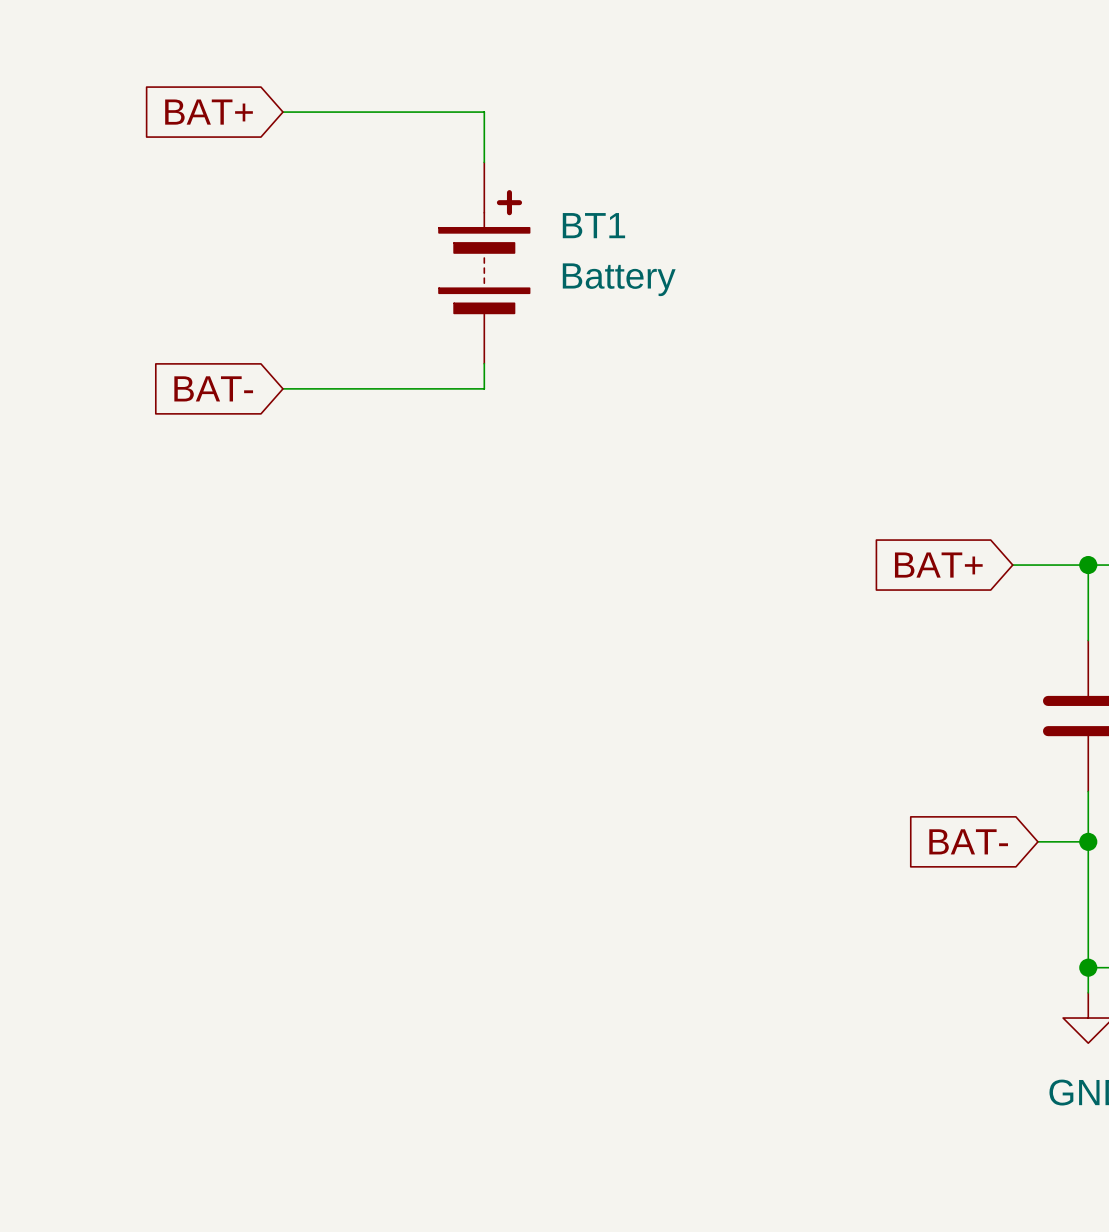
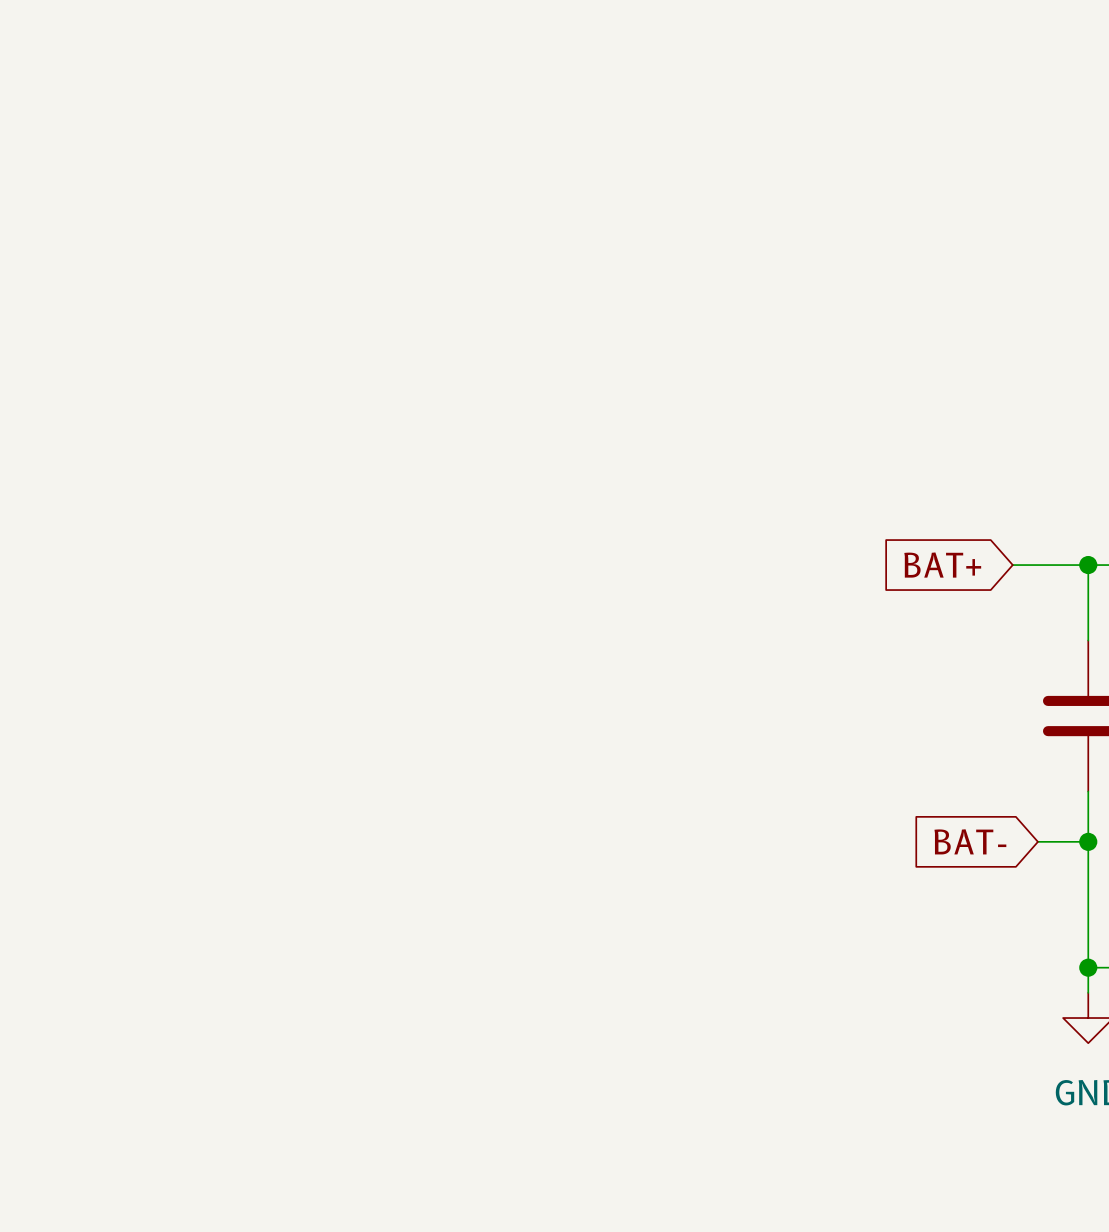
global label: BAT+ (209, 112) -> none
wire: (282, 112) (484, 112) (484, 162) -> none
BT1: Battery (484, 263) -> none
wire: (484, 363) (484, 388) (282, 388) -> none
global label: BAT- (213, 388) -> none

